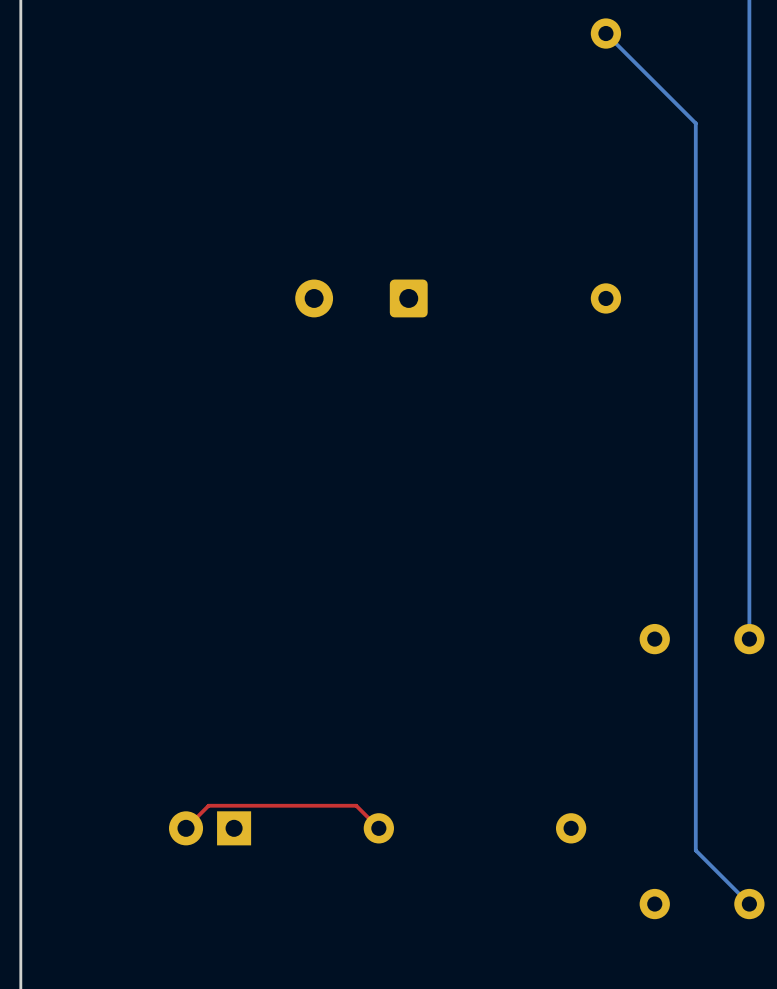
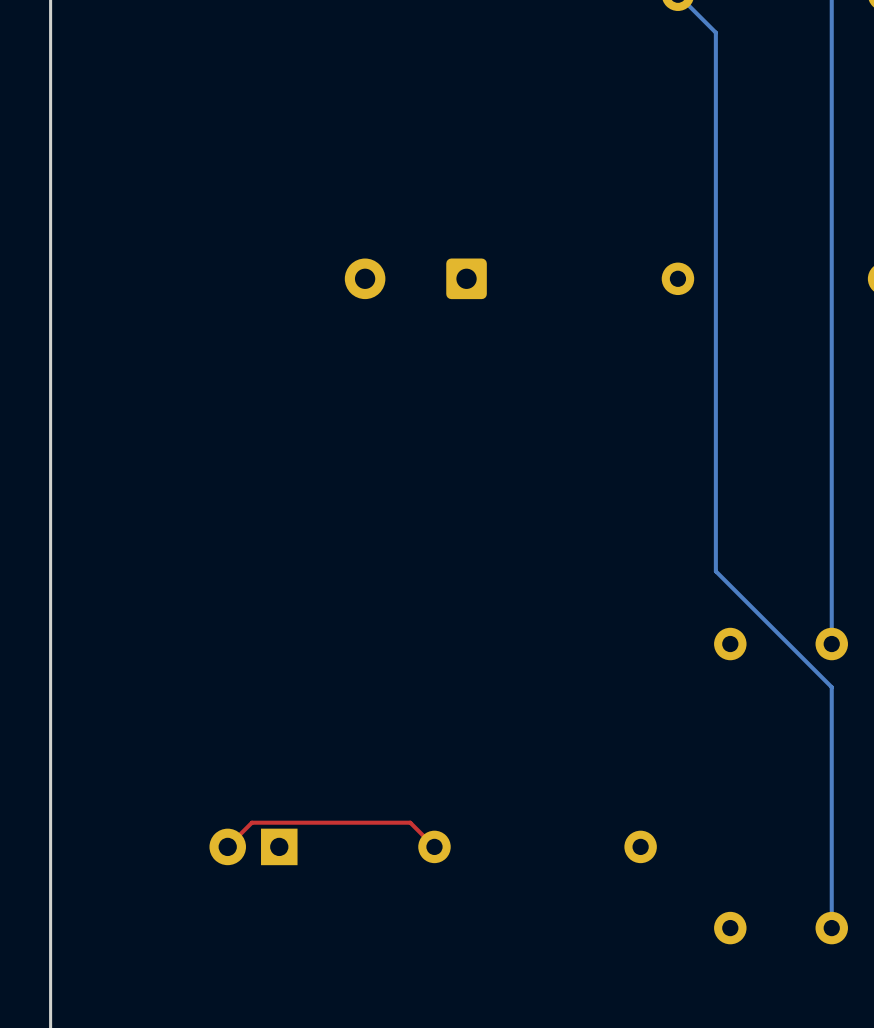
bottom track: (641, 68) (695, 123) (695, 850) (749, 904) -> (715, 32) (715, 571) (831, 687) (831, 928)

